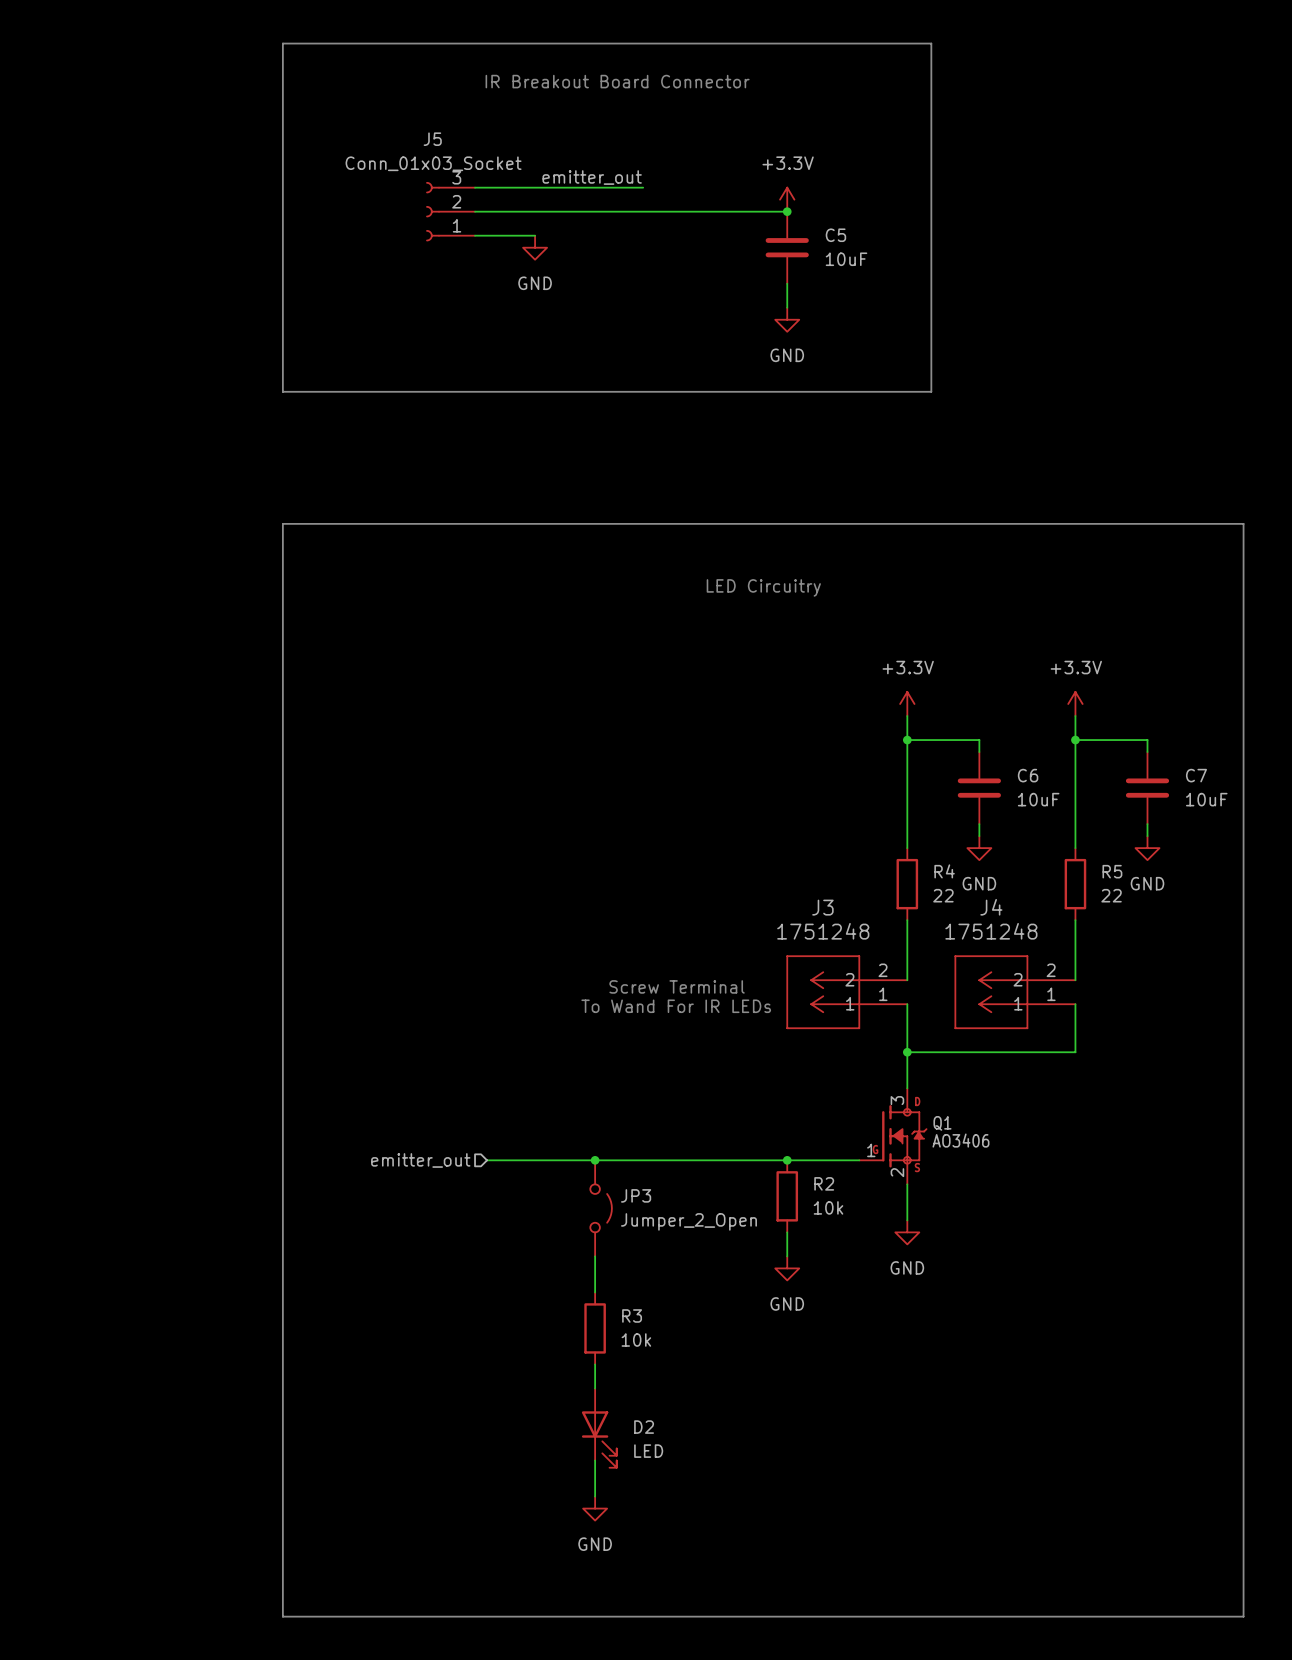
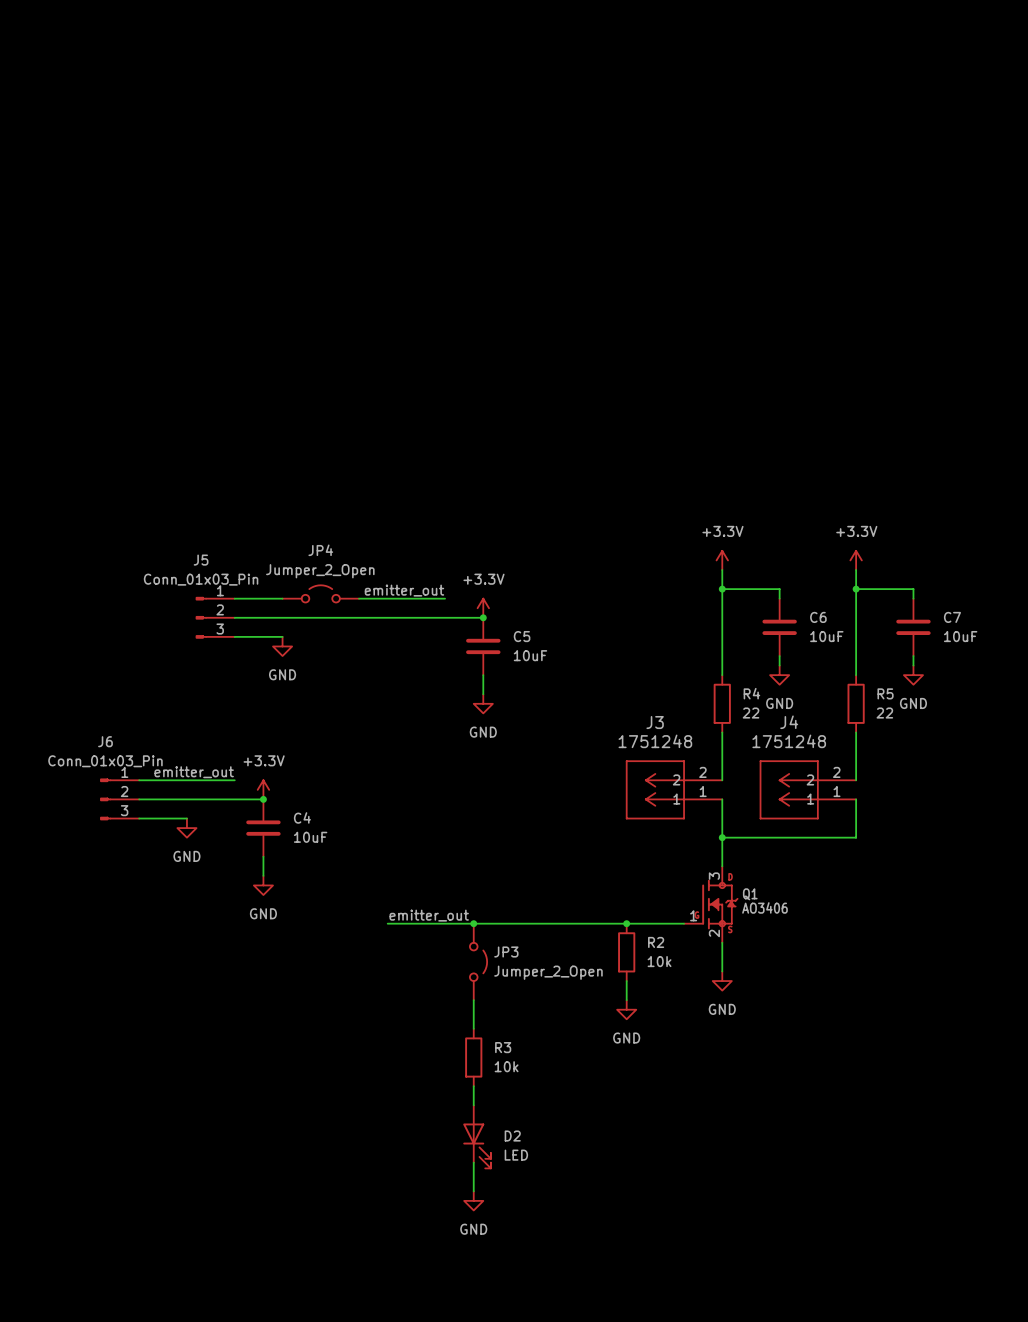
line: (282, 43) (931, 43) (931, 391) (282, 391) (282, 43) -> none
text: IR Breakout Board Connector (617, 81) -> none
J5 value: Conn_01x03_Socket (433, 163) -> Conn_01x03_Pin (201, 579)
label: emitter_out (592, 177) -> none
J5 symbol: [426, 182, 476, 242] -> [195, 597, 235, 639]
wire: (475, 187) (643, 187) -> none
power symbol: +3.3V (787, 199) -> none
wire: (475, 211) (787, 211) -> none
junction: (787, 211) -> none
wire: (475, 235) (535, 235) -> none
power symbol: GND (535, 247) -> none
C5 position: (787, 247) -> (483, 646)
wire: (787, 283) (787, 307) -> none
power symbol: GND (787, 319) -> none
line: (282, 523) (282, 1616) (1243, 1616) (1243, 523) (282, 523) -> none
text: LED Circuitry (763, 587) -> none
label: none -> emitter_out (404, 590)
JP4: none -> Jumper_2_Open (320, 593)
wire: none -> (234, 598) (282, 598)
wire: none -> (359, 598) (445, 598)
power symbol: none -> +3.3V (483, 608)
wire: none -> (234, 617) (483, 617)
junction: none -> (483, 617)
wire: none -> (234, 636) (282, 636)
power symbol: none -> GND (282, 646)
wire: none -> (483, 675) (483, 694)
power symbol: none -> GND (483, 703)
label: none -> emitter_out (194, 772)
wire: none -> (139, 780) (234, 780)
text: Screw Terminal (677, 986) -> none
power symbol: none -> +3.3V (263, 789)
J6: none -> Conn_01x03_Pin (119, 799)
wire: none -> (139, 799) (263, 799)
junction: none -> (263, 799)
text: To Wand For IR LEDs (676, 1006) -> none
wire: none -> (139, 818) (186, 818)
power symbol: none -> GND (186, 828)
C4: none -> 10uF (263, 828)
wire: none -> (263, 856) (263, 875)
power symbol: none -> GND (263, 885)
label: none -> emitter_out (429, 915)
hierarchical label: emitter_out (420, 1160) -> none

